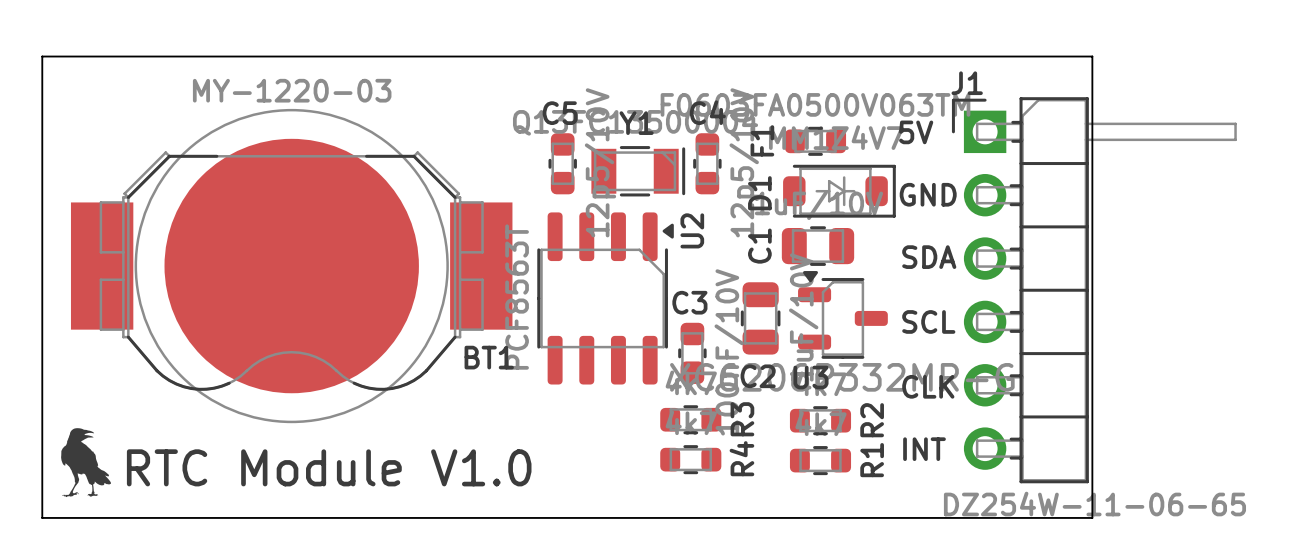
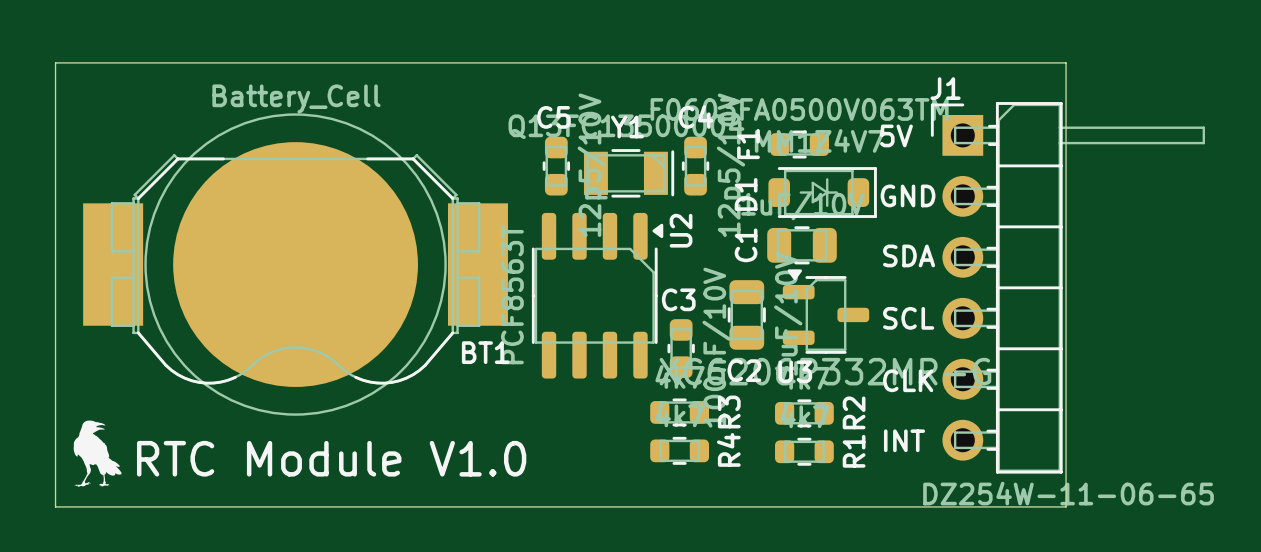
BT1 value: MY-1220-03 (292, 90) -> Battery_Cell (296, 99)

